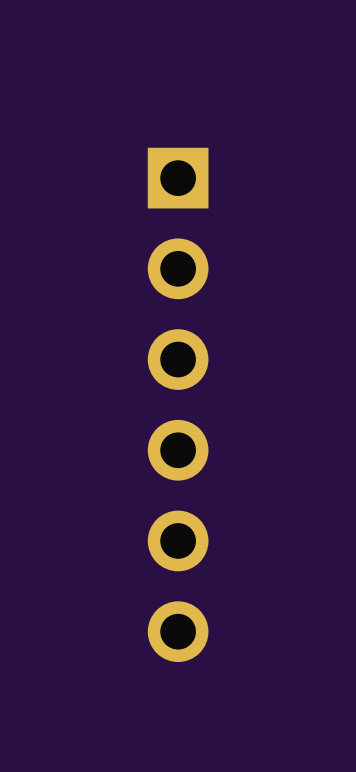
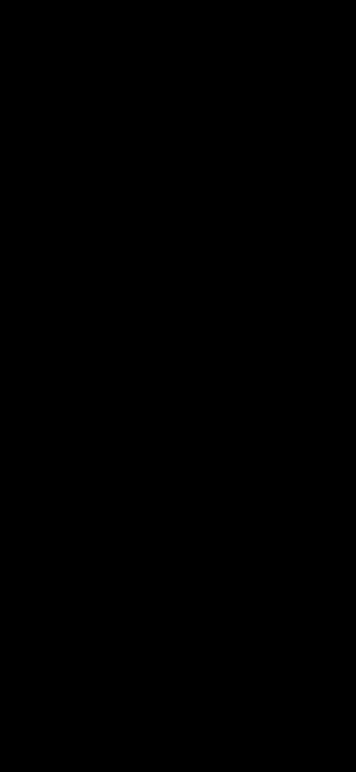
part: (178, 404) -> none

